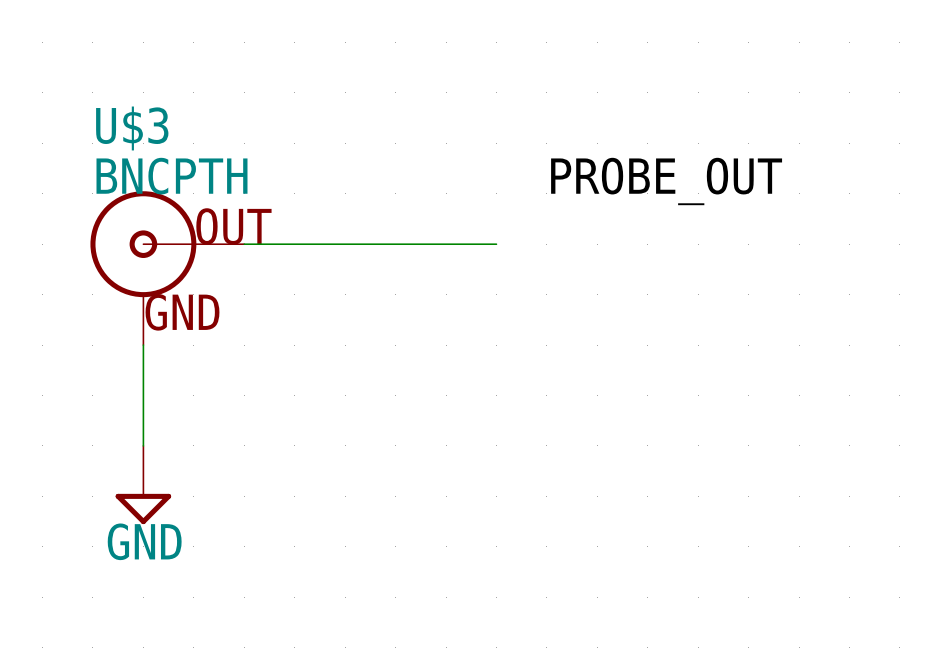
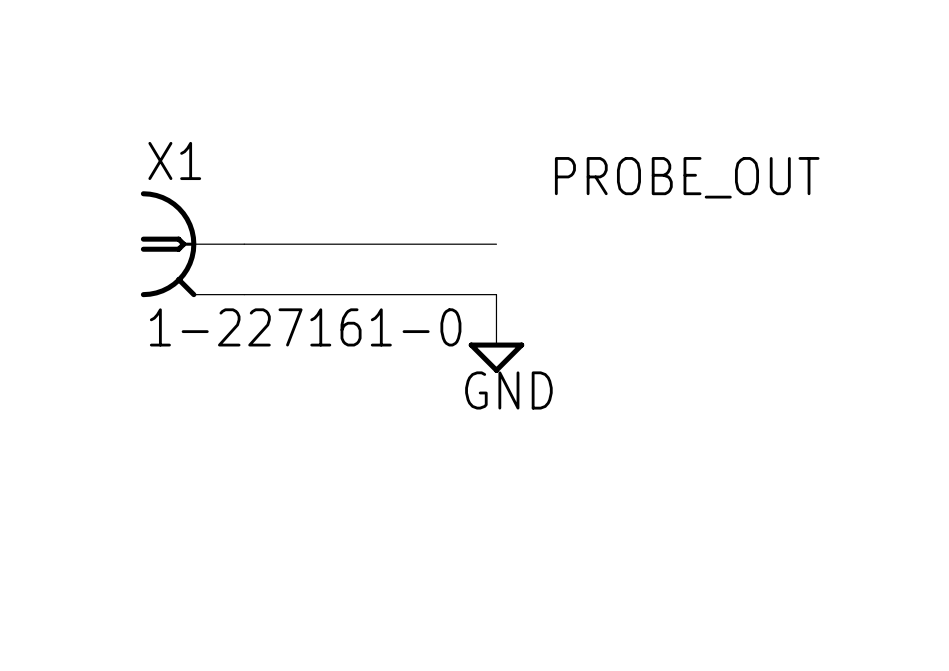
X1: none -> 1-227161-0 (192, 244)
U$3: BNCPTH (167, 268) -> none
wire: none -> (244, 294) (496, 294)
wire: (143, 345) (143, 445) -> none
power symbol position: GND (143, 485) -> GND (496, 333)

